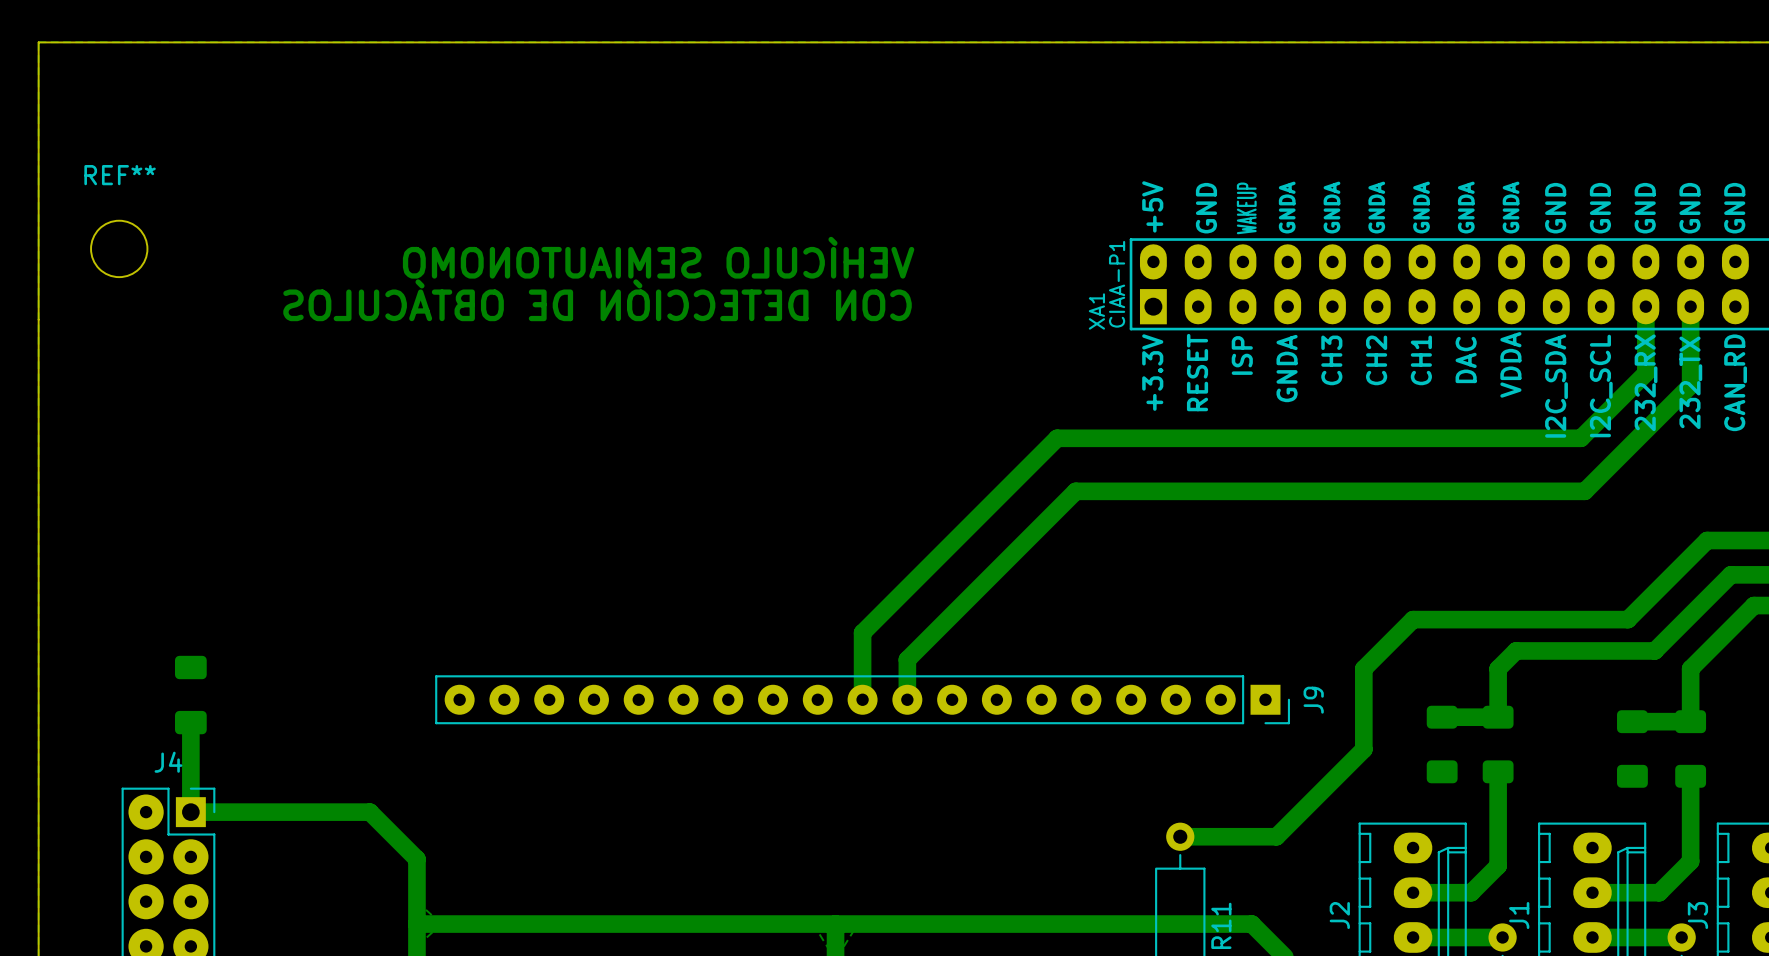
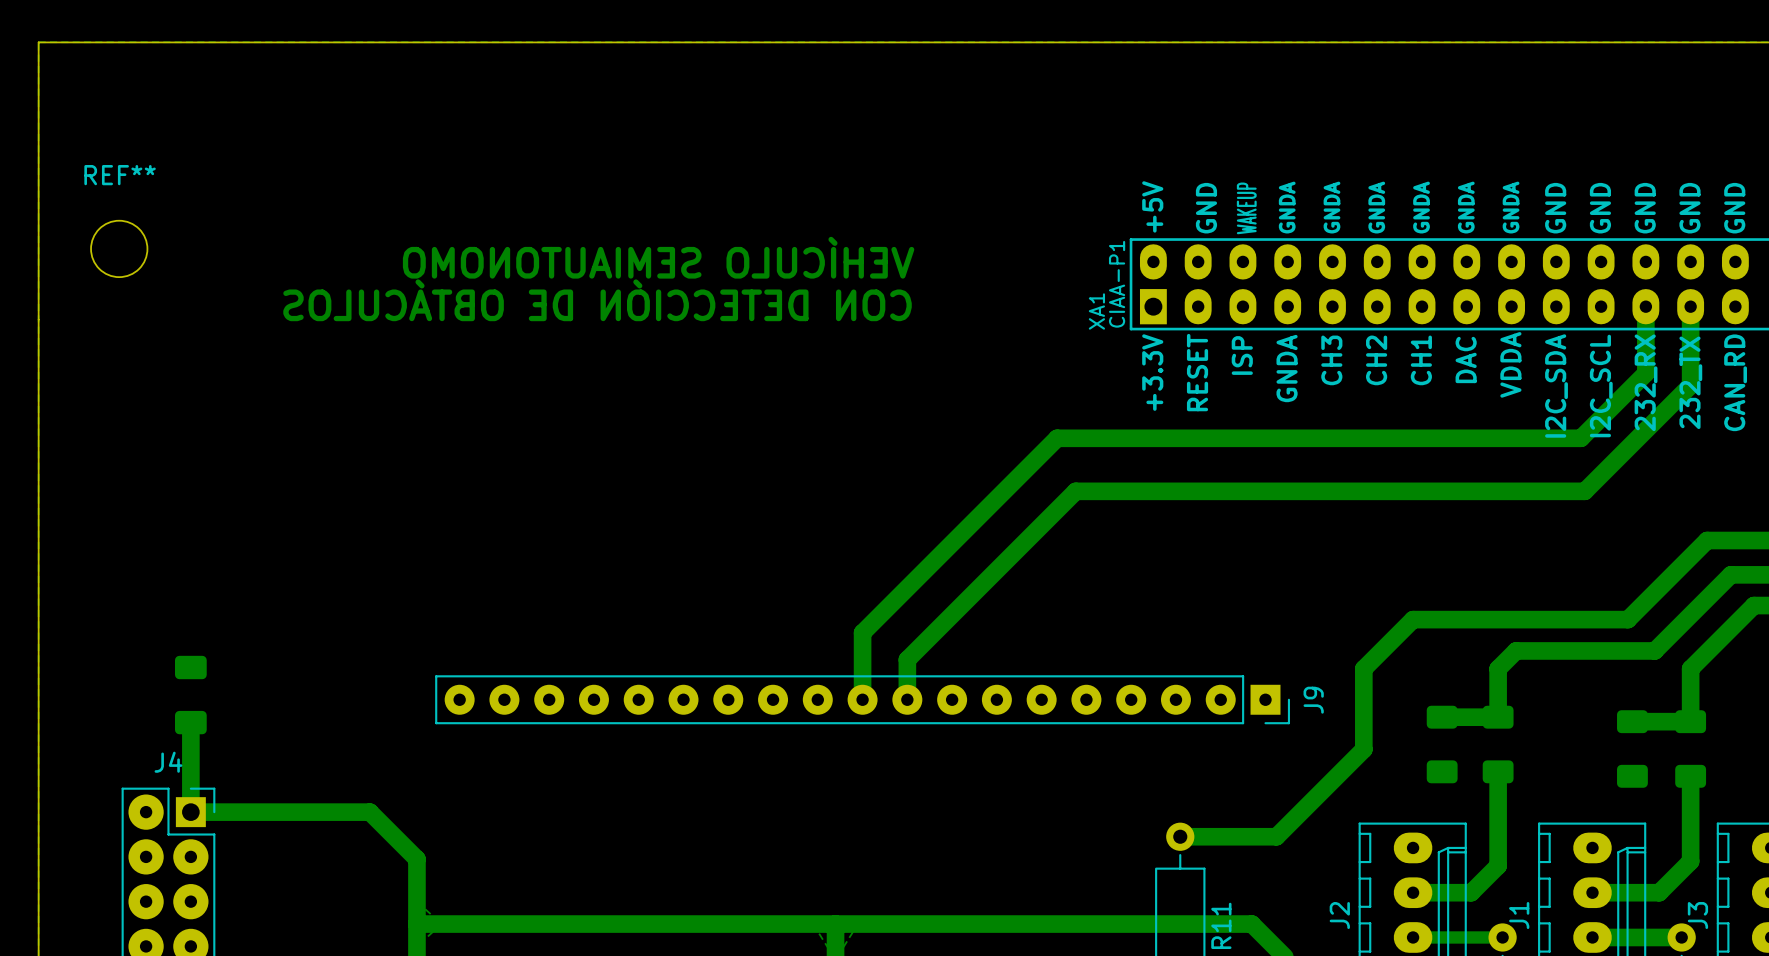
bottom track width: thick (1413, 937) (1502, 937) -> thin (1413, 937) (1502, 937)

